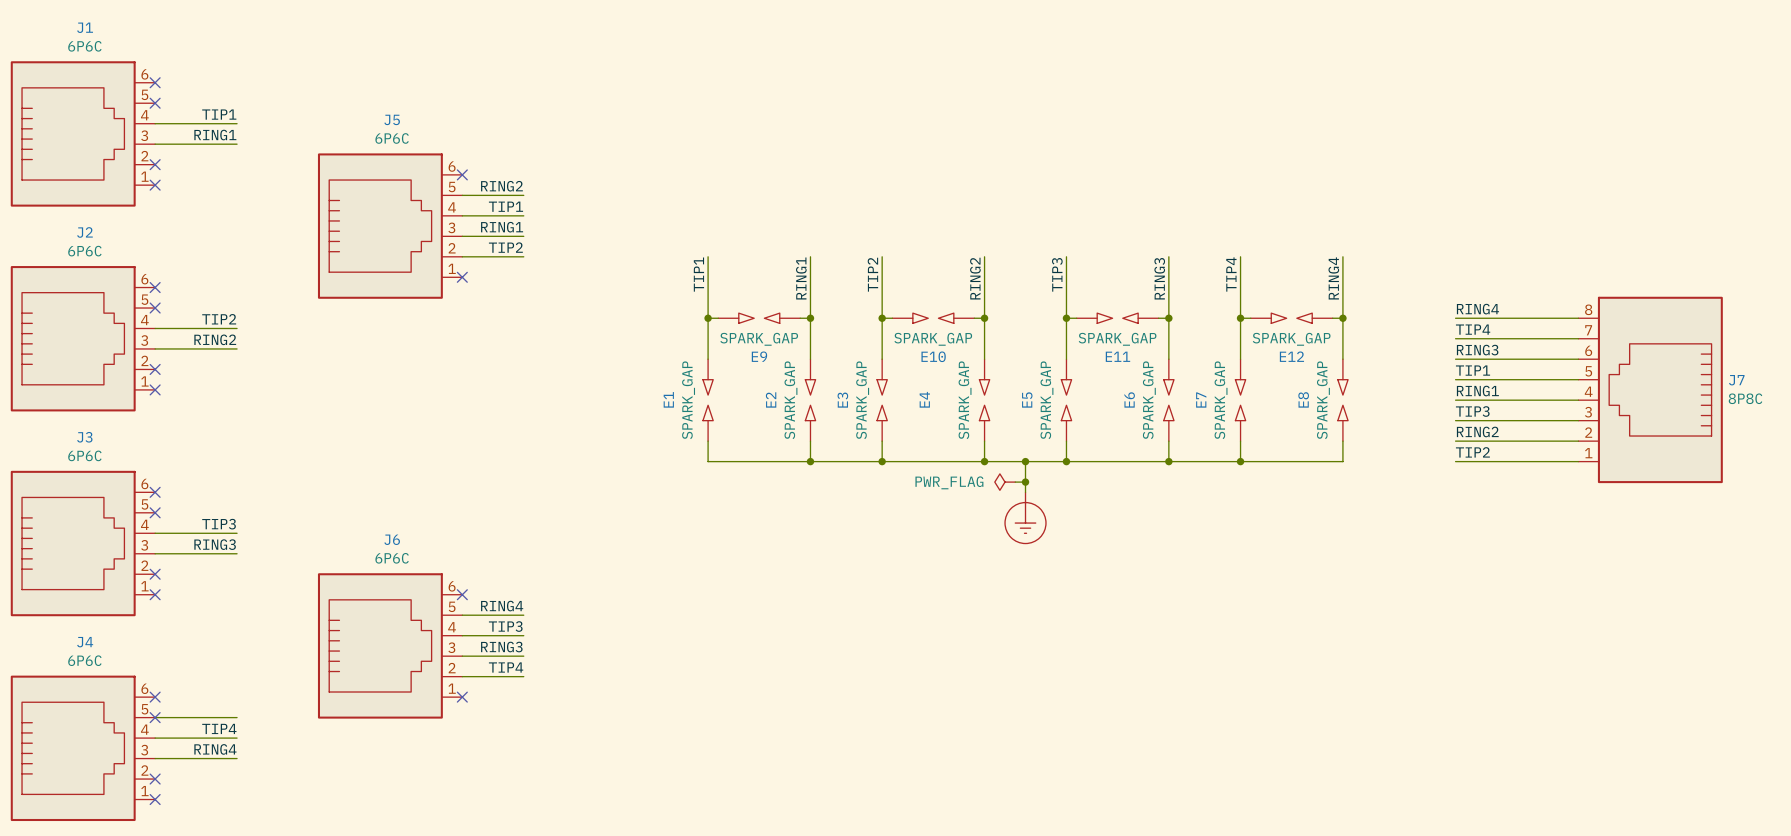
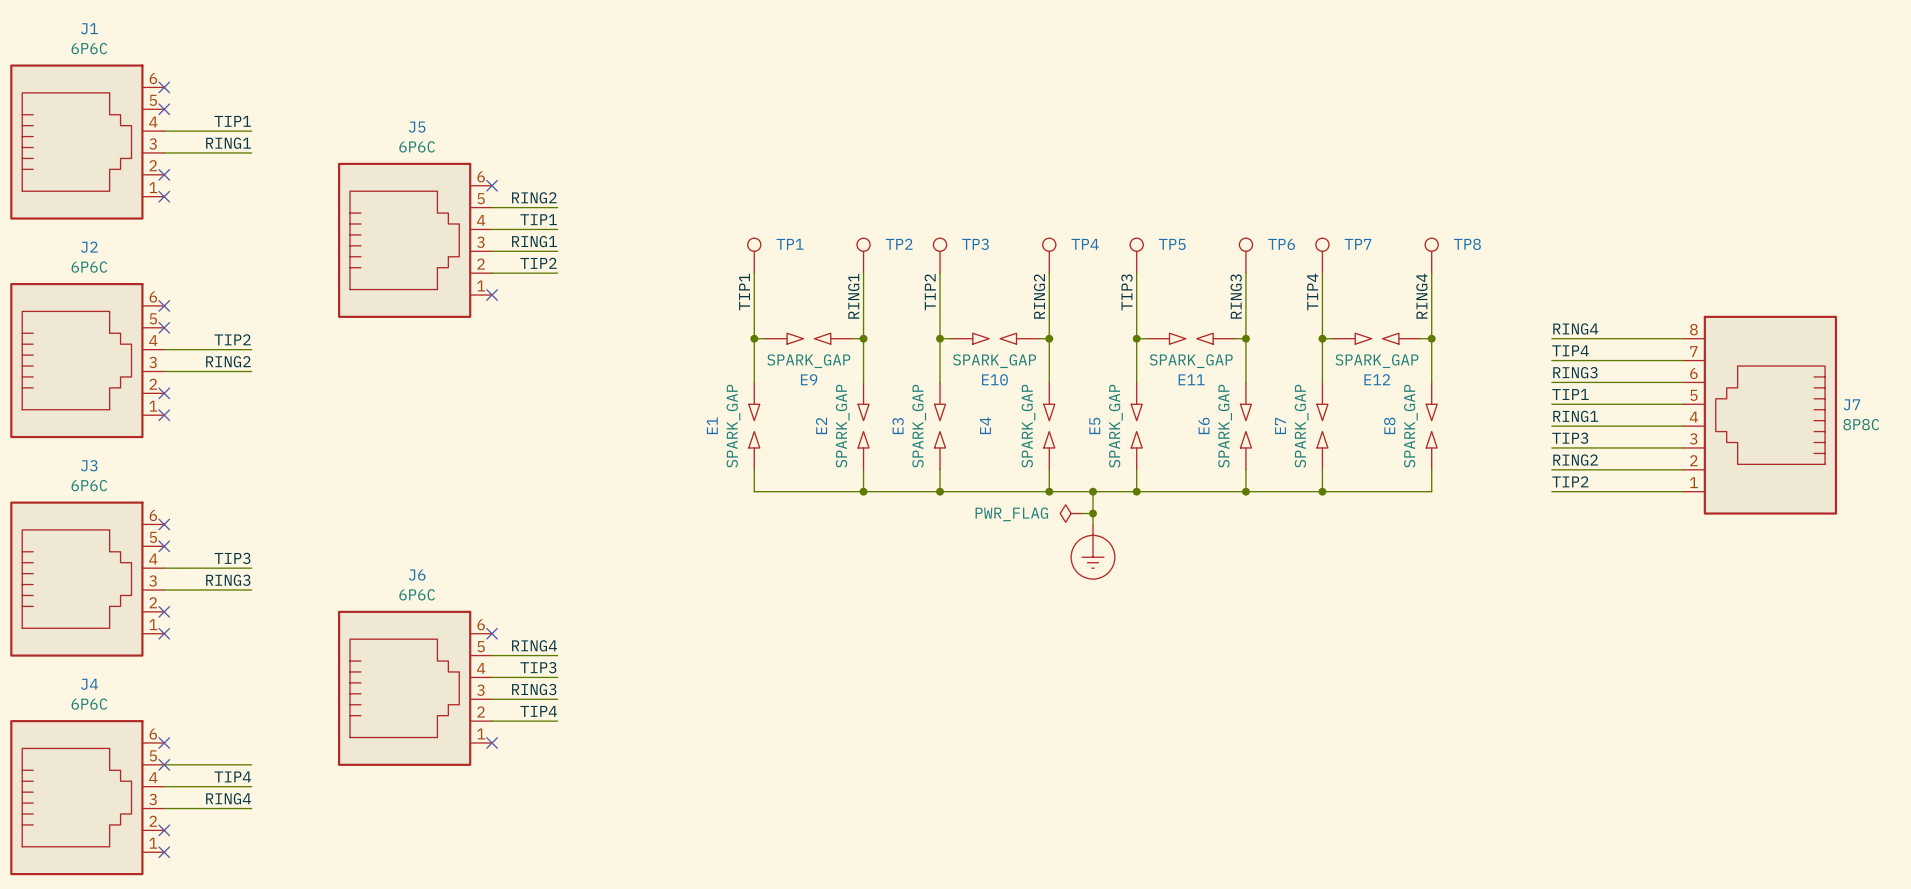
TP1: none -> (754, 255)
TP2: none -> (863, 255)
TP3: none -> (940, 255)
TP4: none -> (1049, 255)
TP5: none -> (1136, 255)
TP6: none -> (1245, 255)
TP7: none -> (1322, 255)
TP8: none -> (1431, 255)

